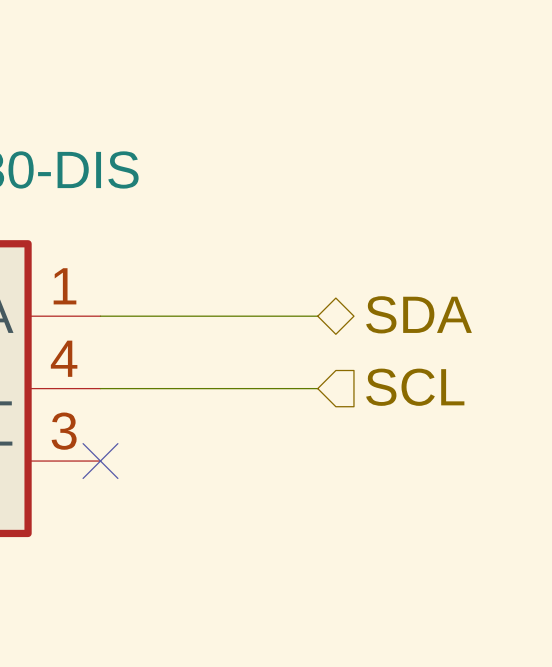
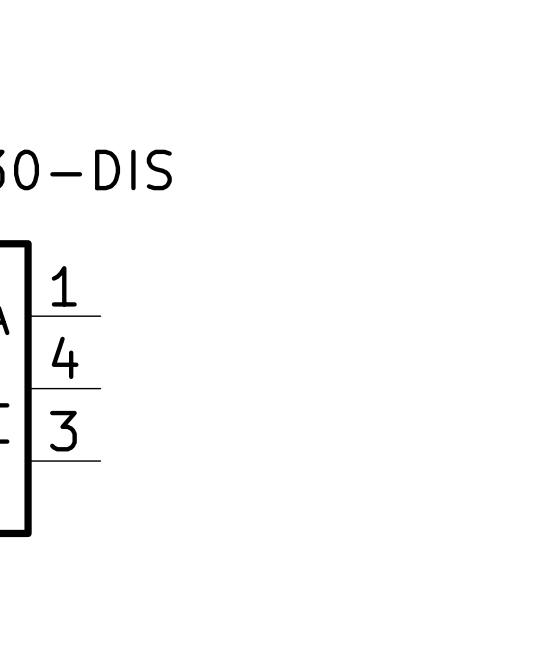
hierarchical label: SDA (419, 314) -> none
wire: (100, 316) (317, 316) -> none
hierarchical label: SCL (415, 387) -> none
wire: (100, 388) (317, 388) -> none
no-connect mark: (100, 461) -> none

